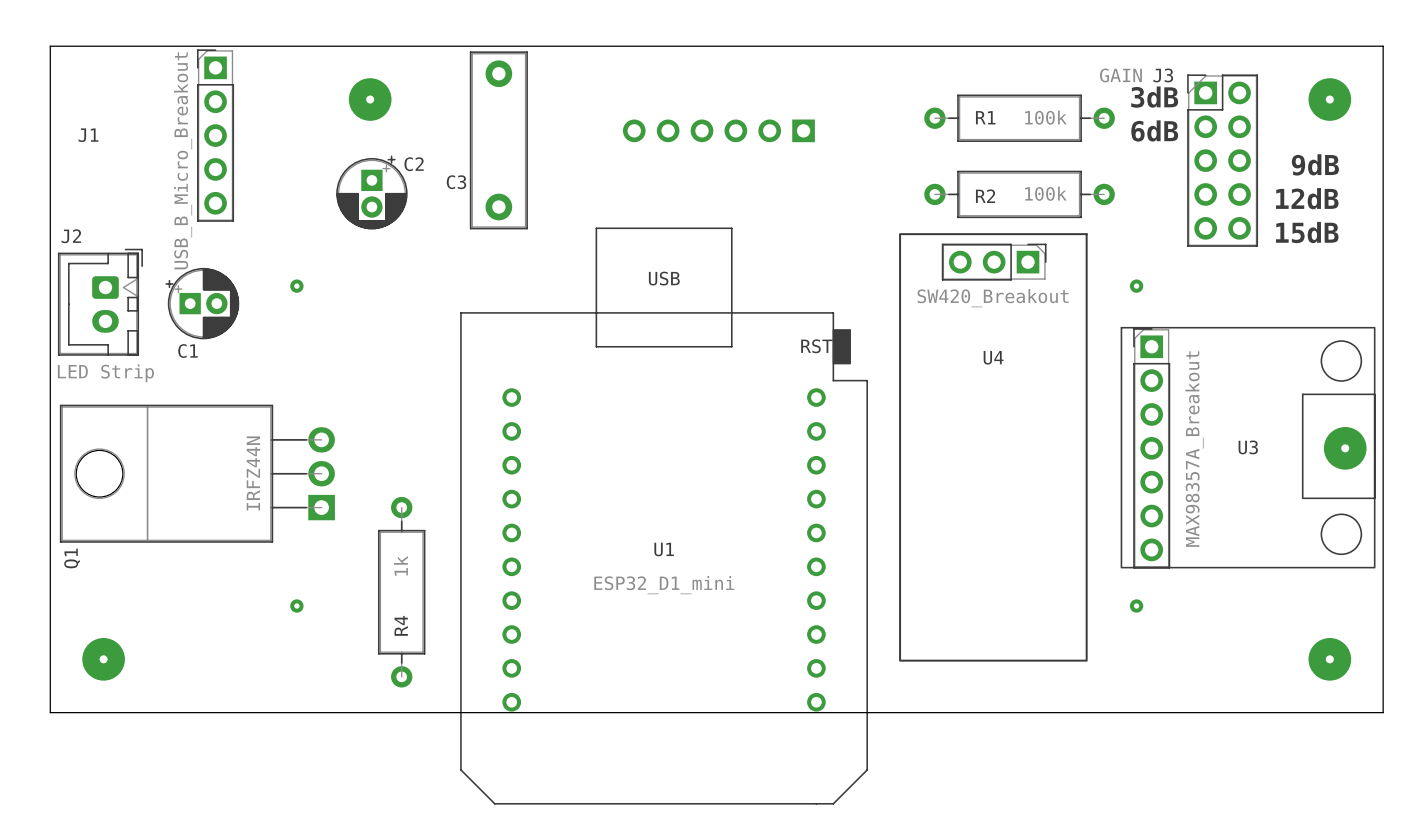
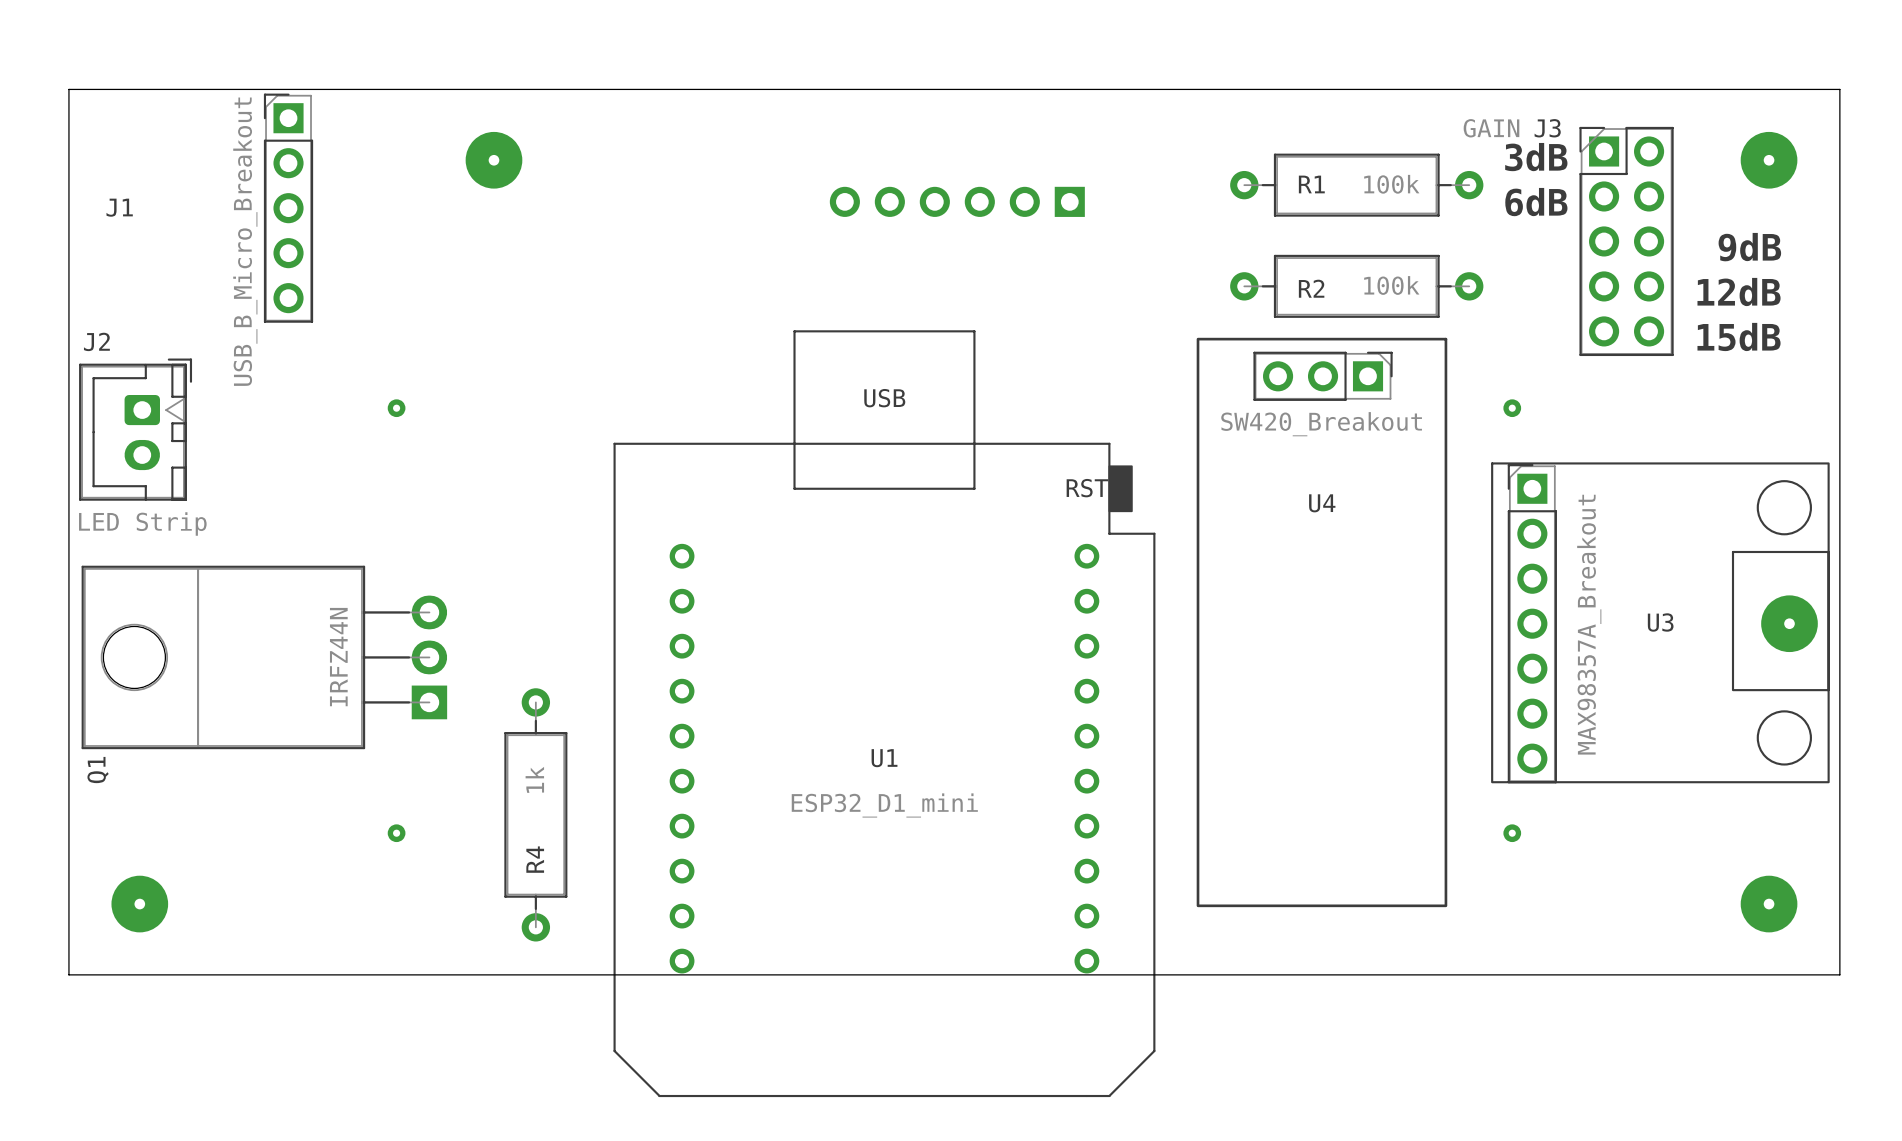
C3: (498, 140) -> none
C2: (371, 192) -> none
C1: (202, 303) -> none

